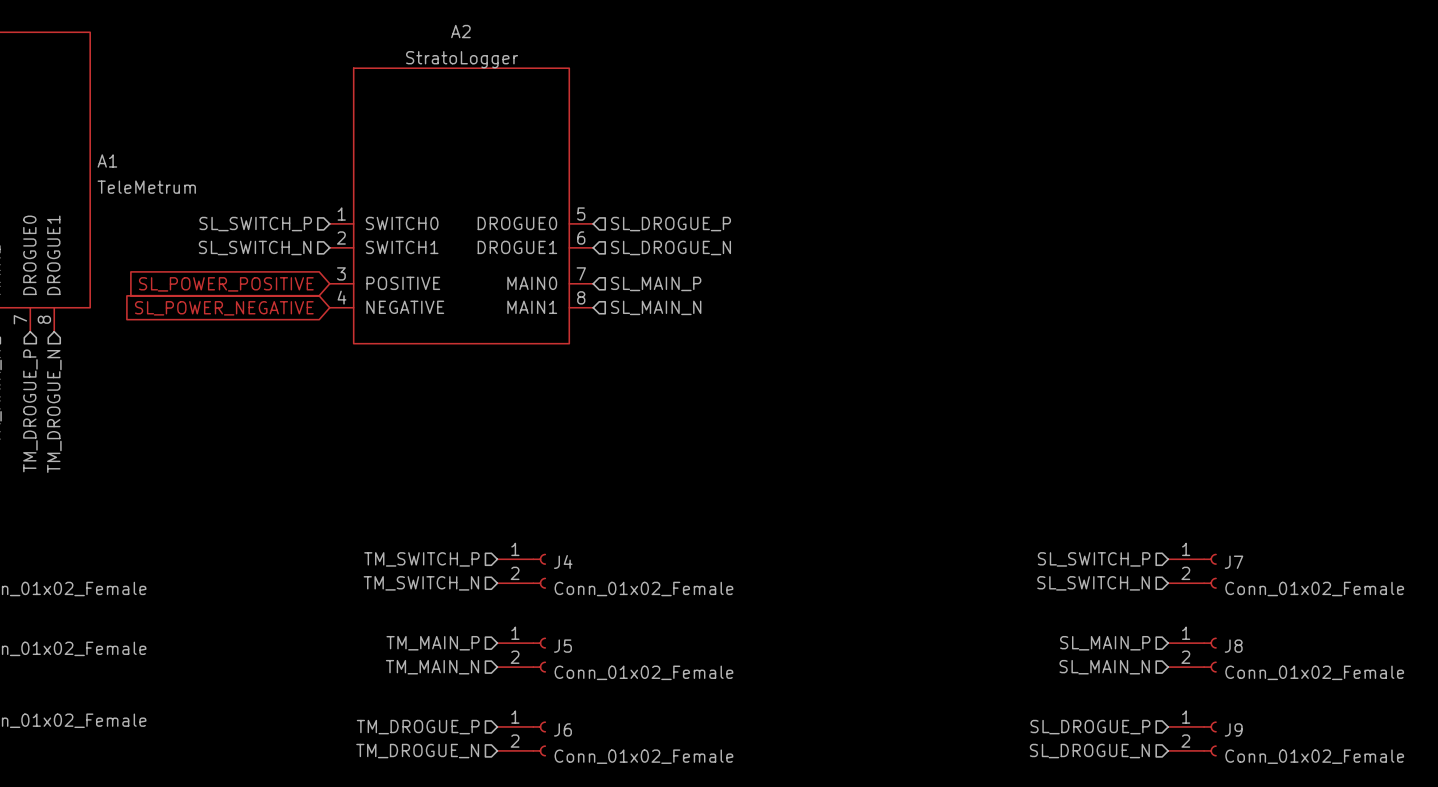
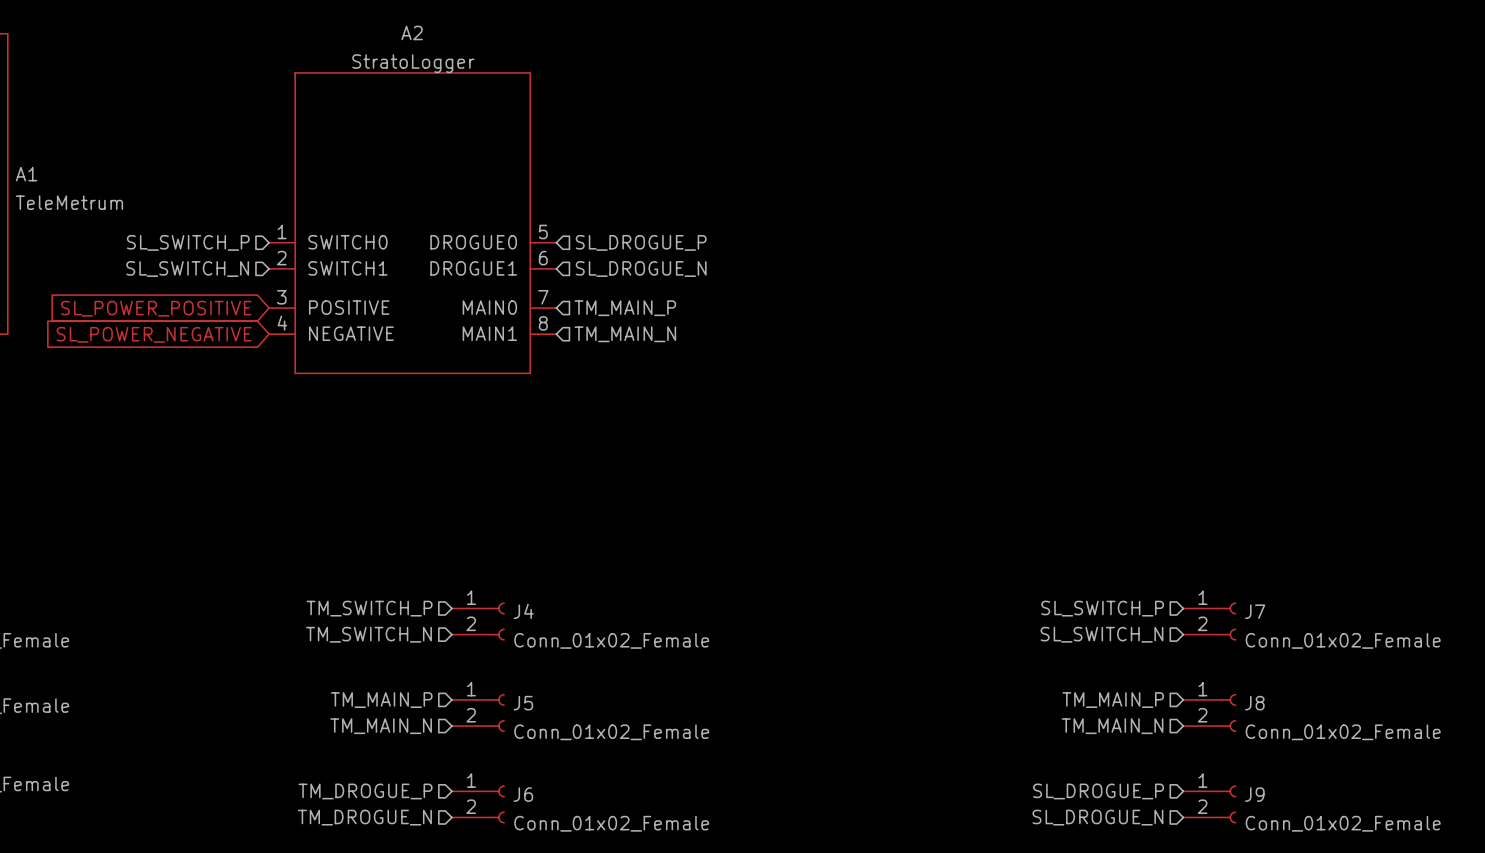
hierarchical label: SL_MAIN_P (656, 283) -> TM_MAIN_P (625, 308)
hierarchical label: SL_MAIN_N (656, 307) -> TM_MAIN_N (625, 334)
hierarchical label: SL_MAIN_P (1105, 643) -> TM_MAIN_P (1113, 700)
hierarchical label: SL_MAIN_N (1104, 667) -> TM_MAIN_N (1112, 726)

